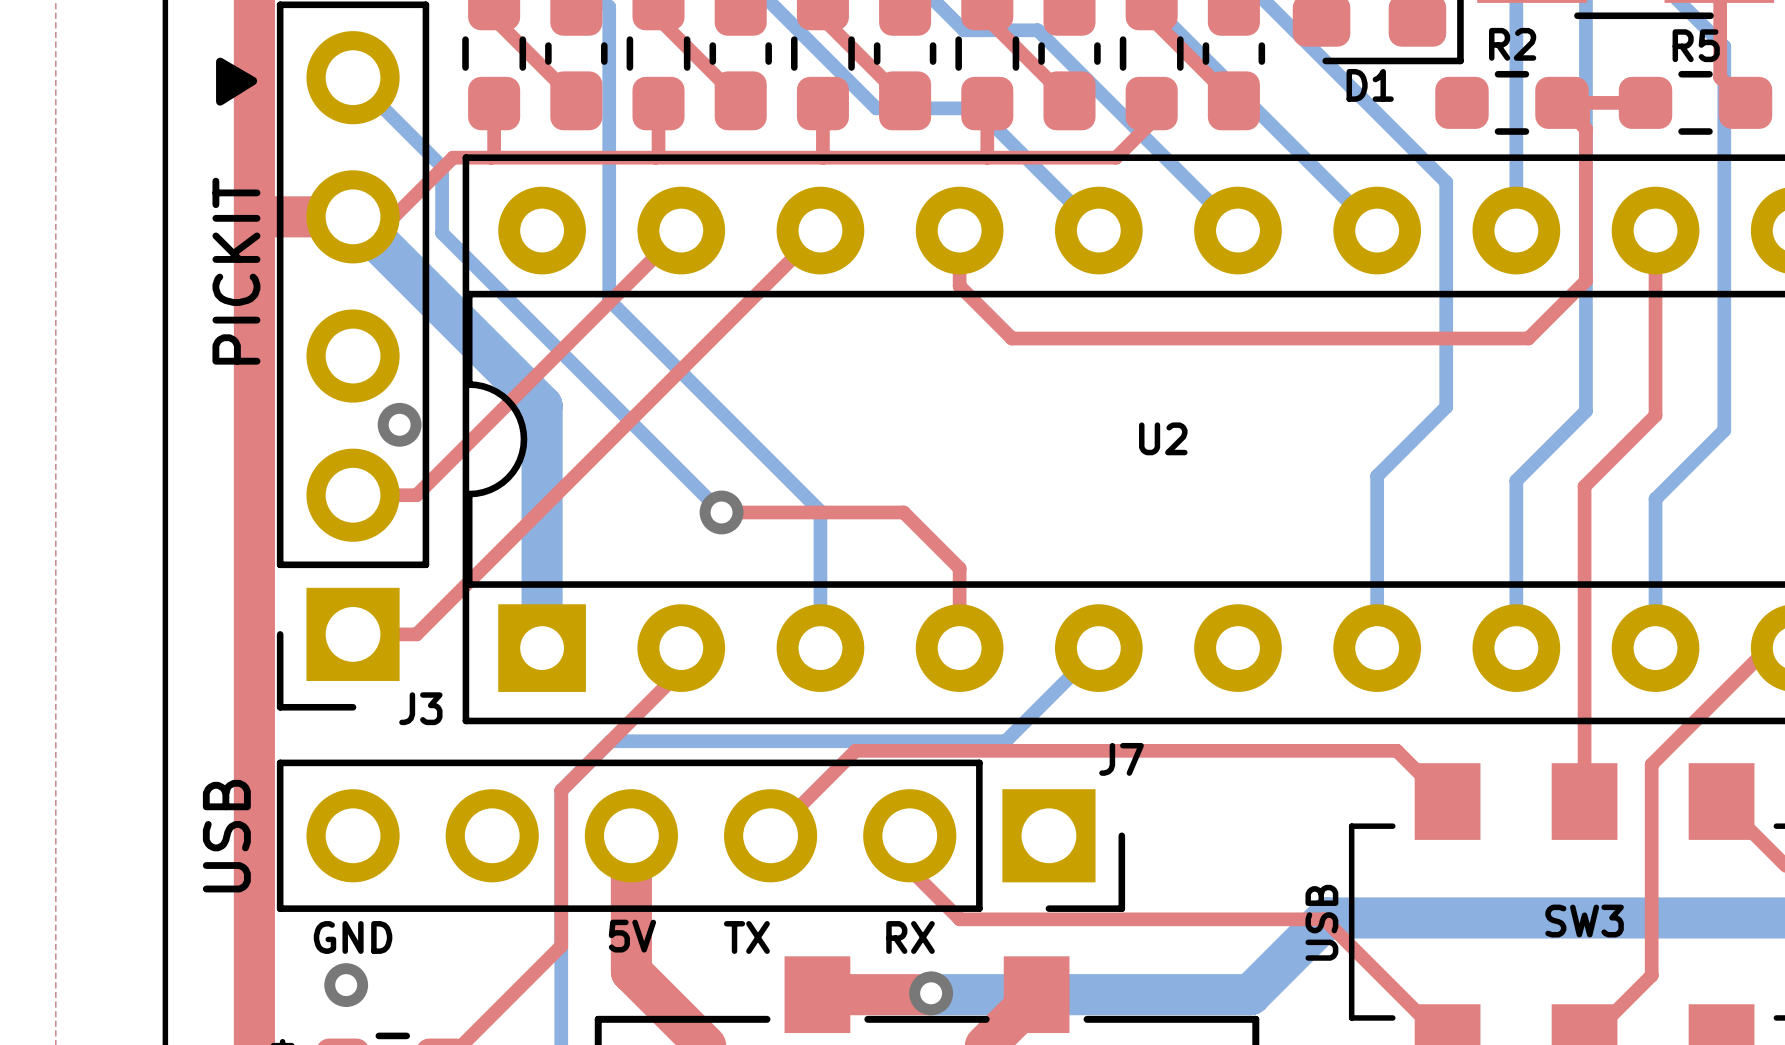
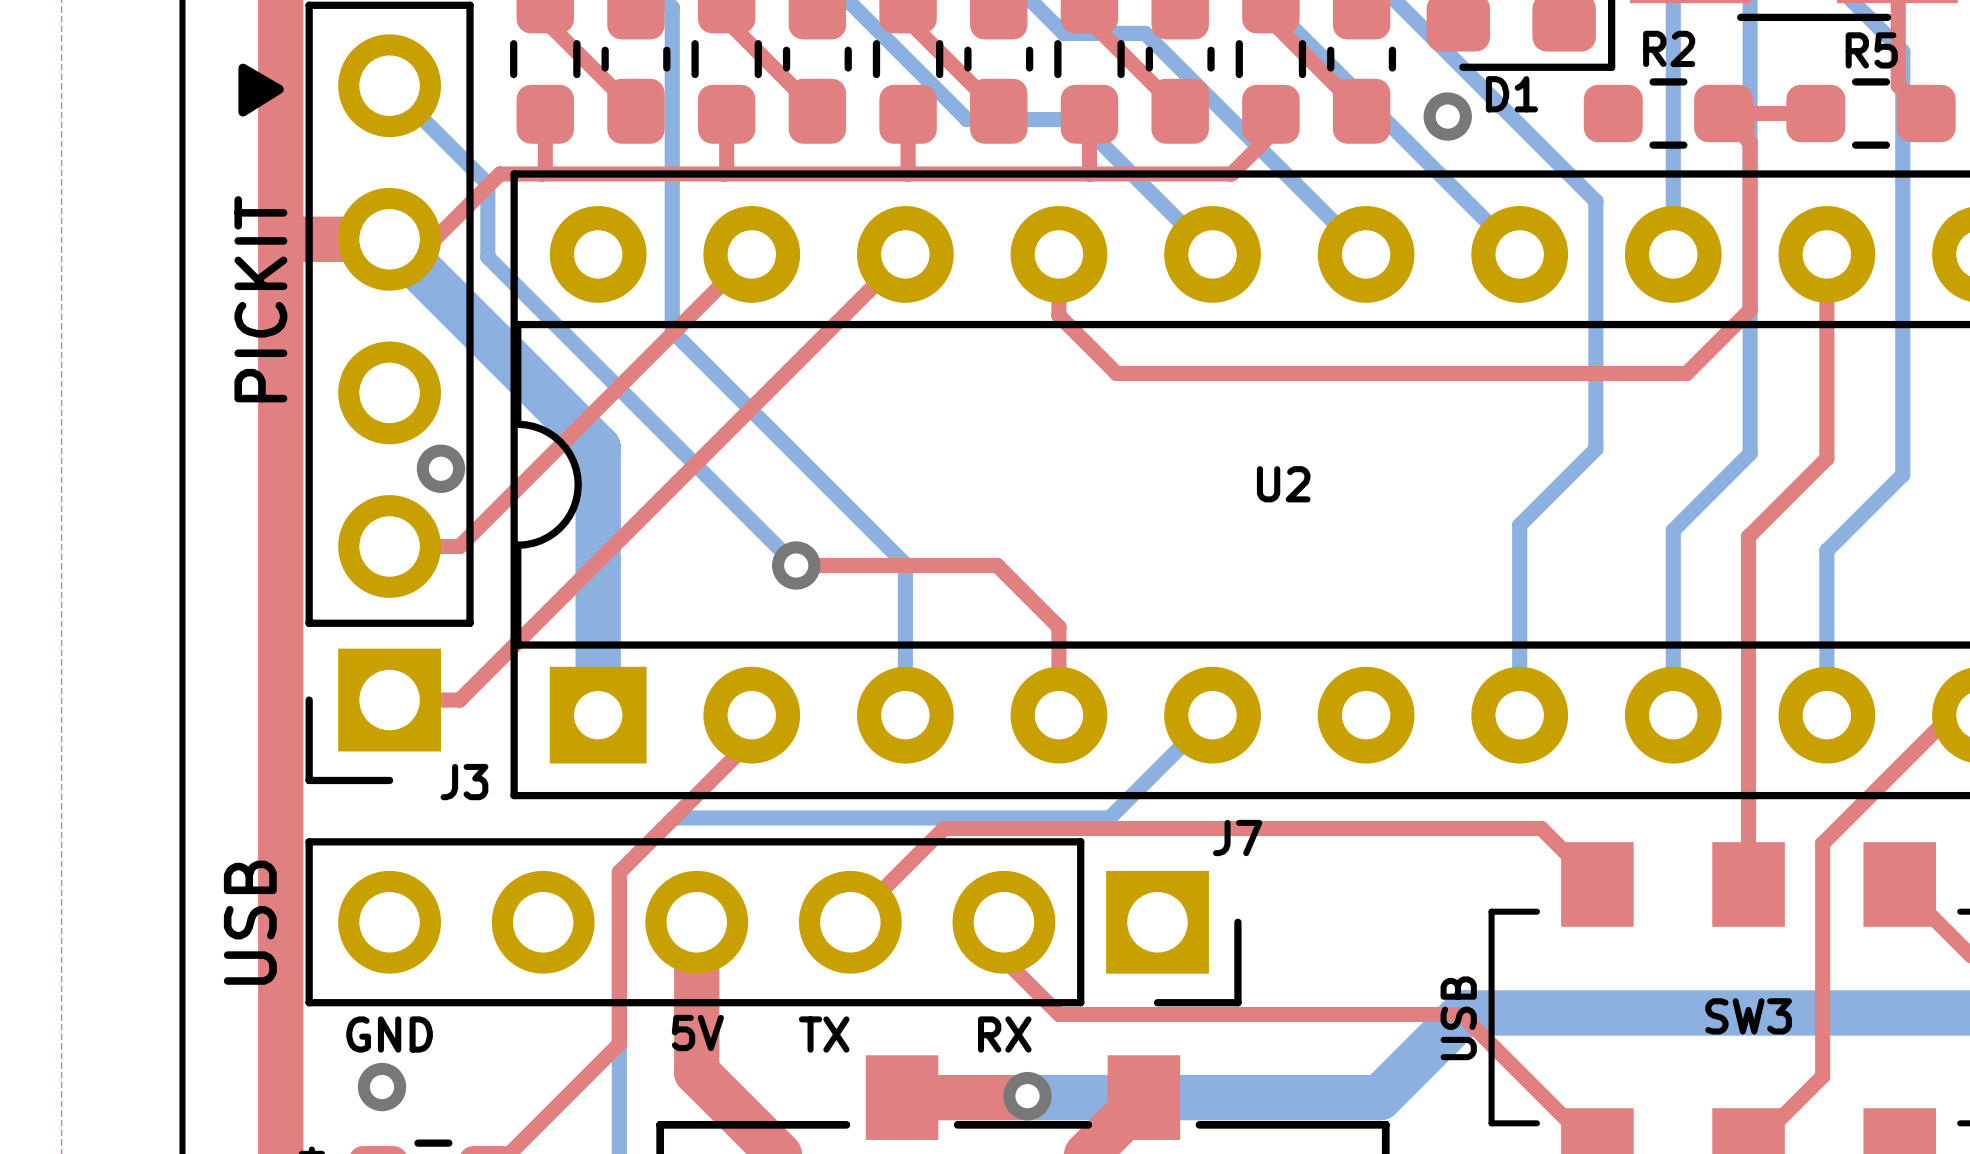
via: none -> (1447, 116)

